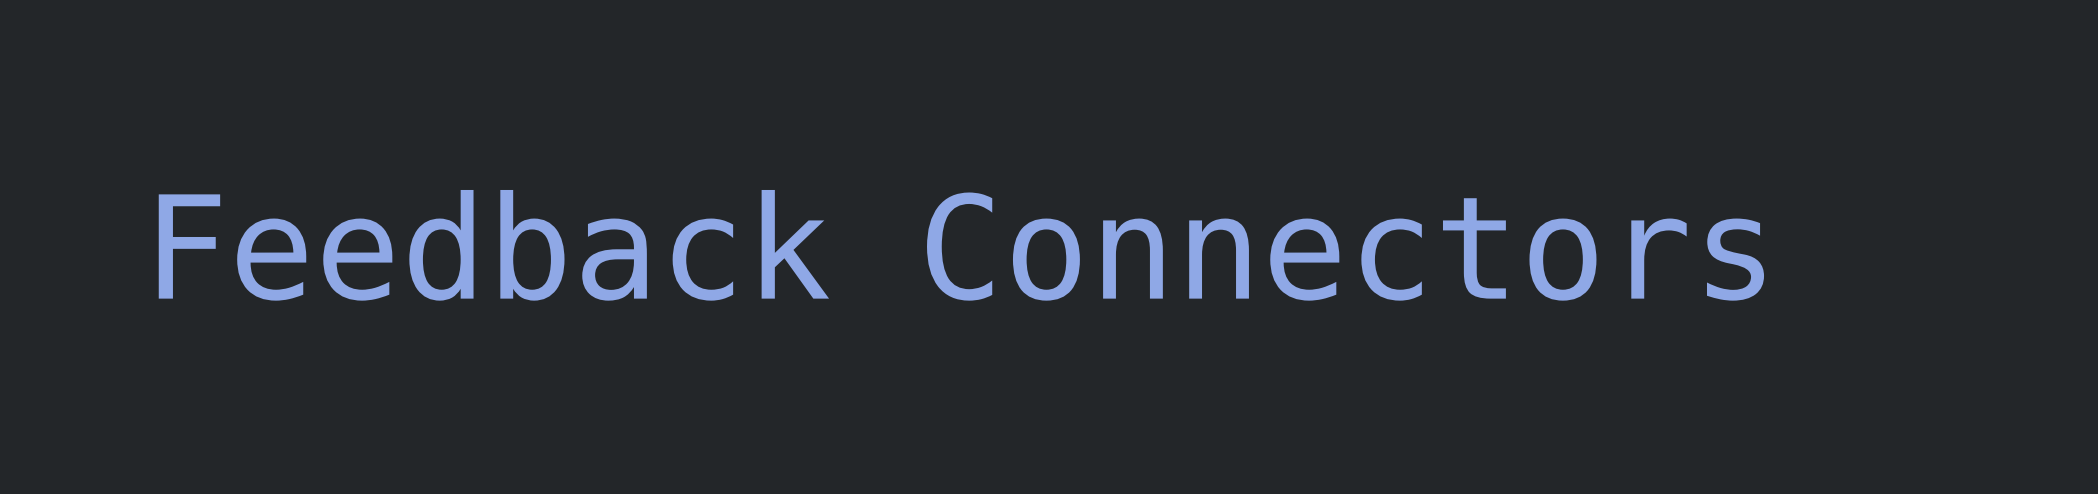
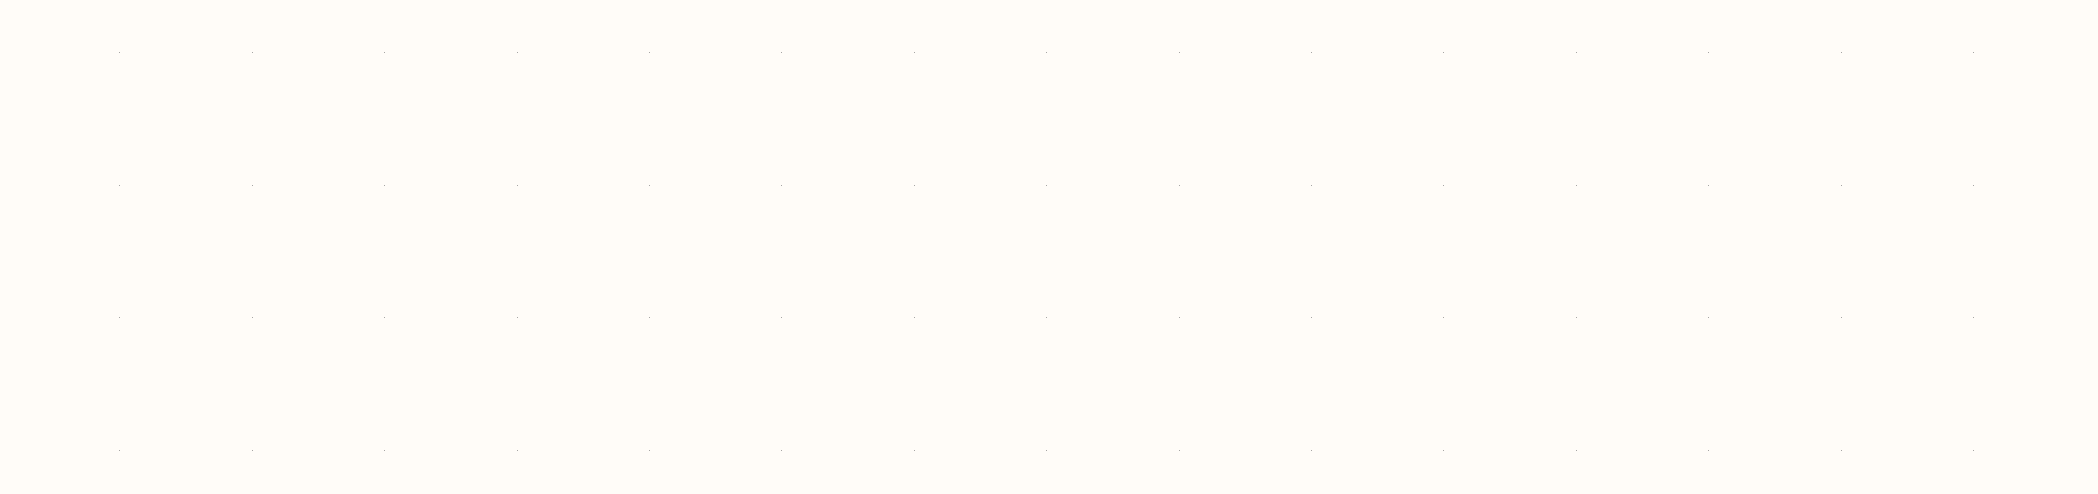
text: Feedback Connectors (961, 245) -> none

